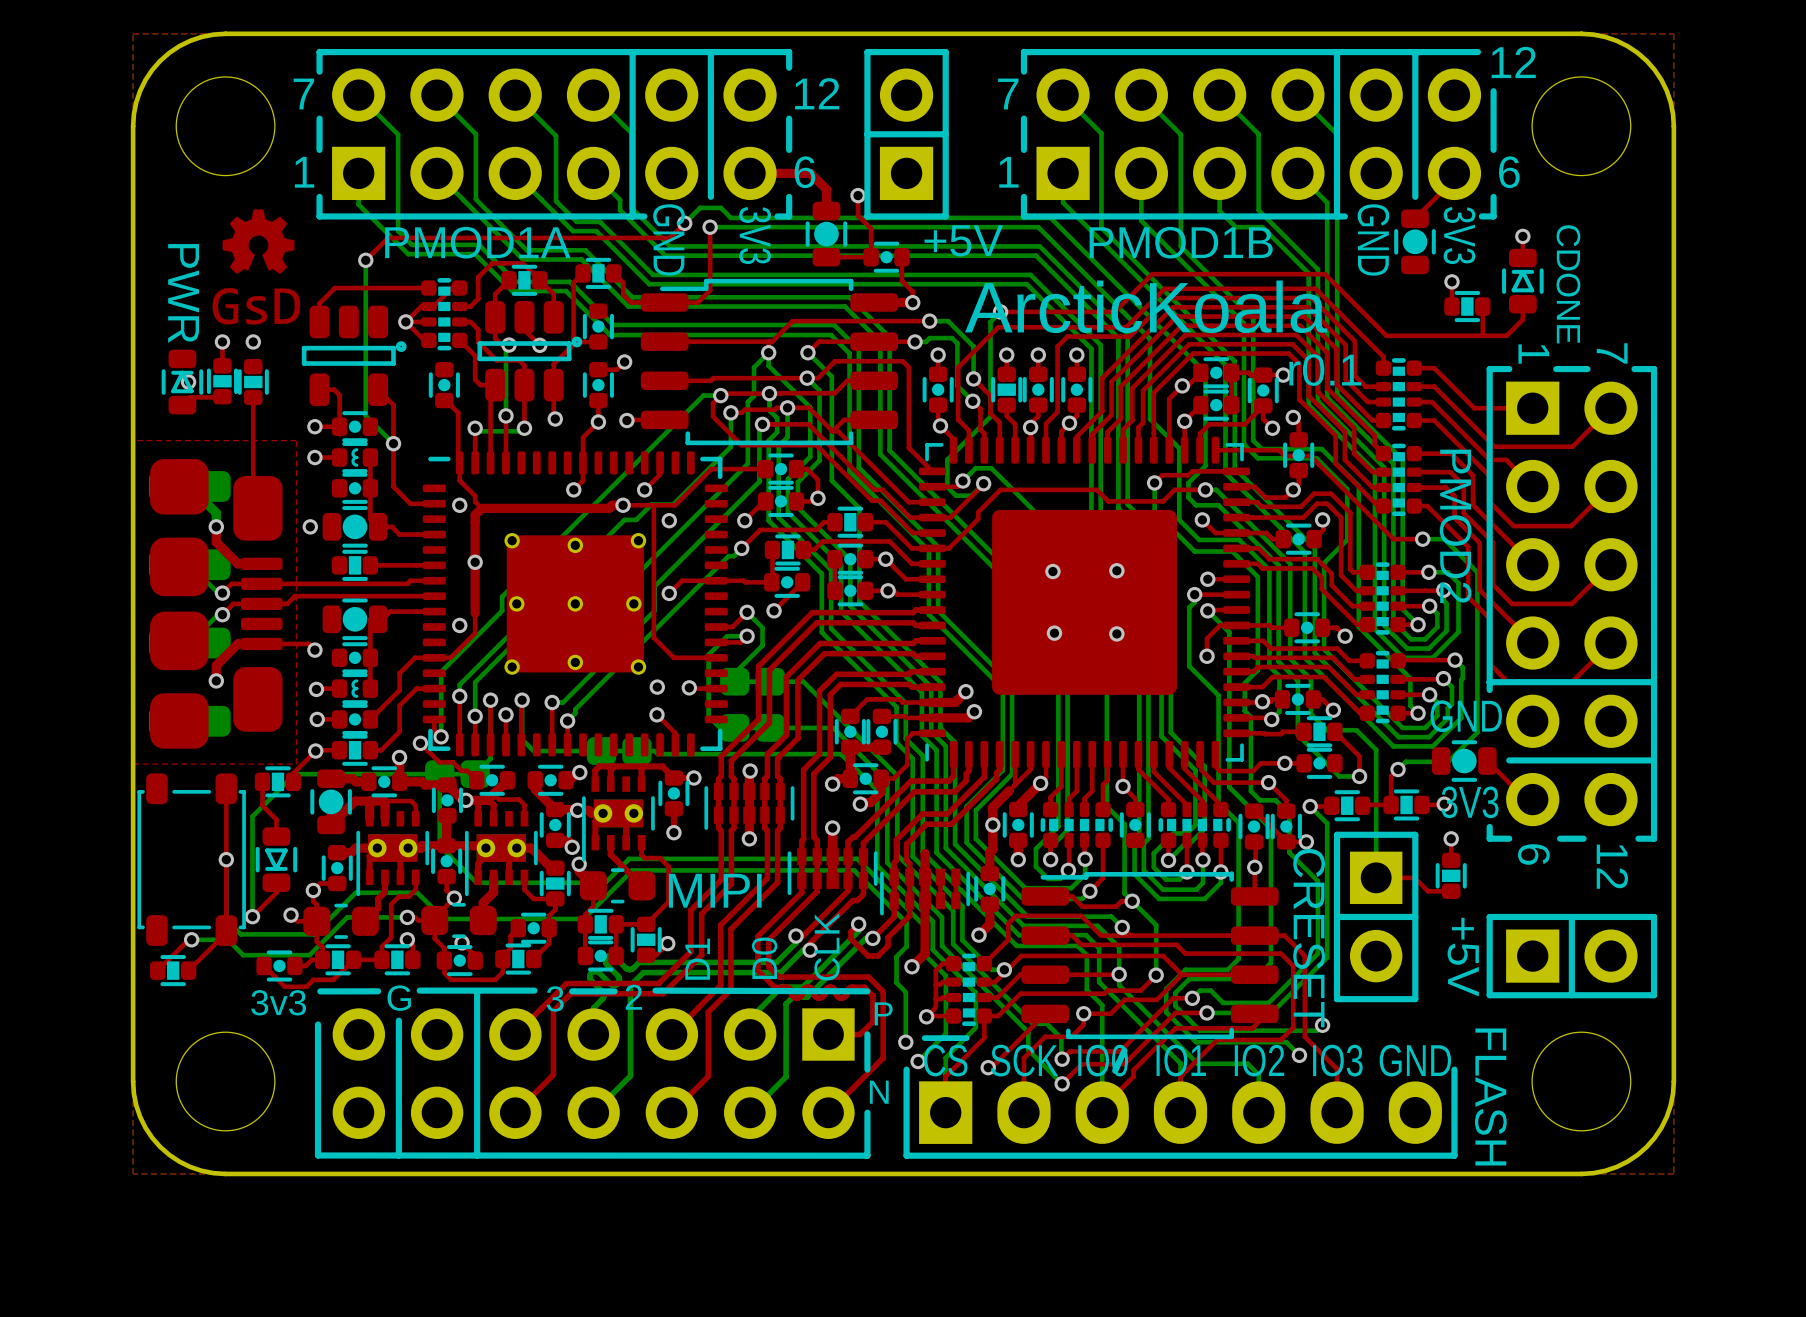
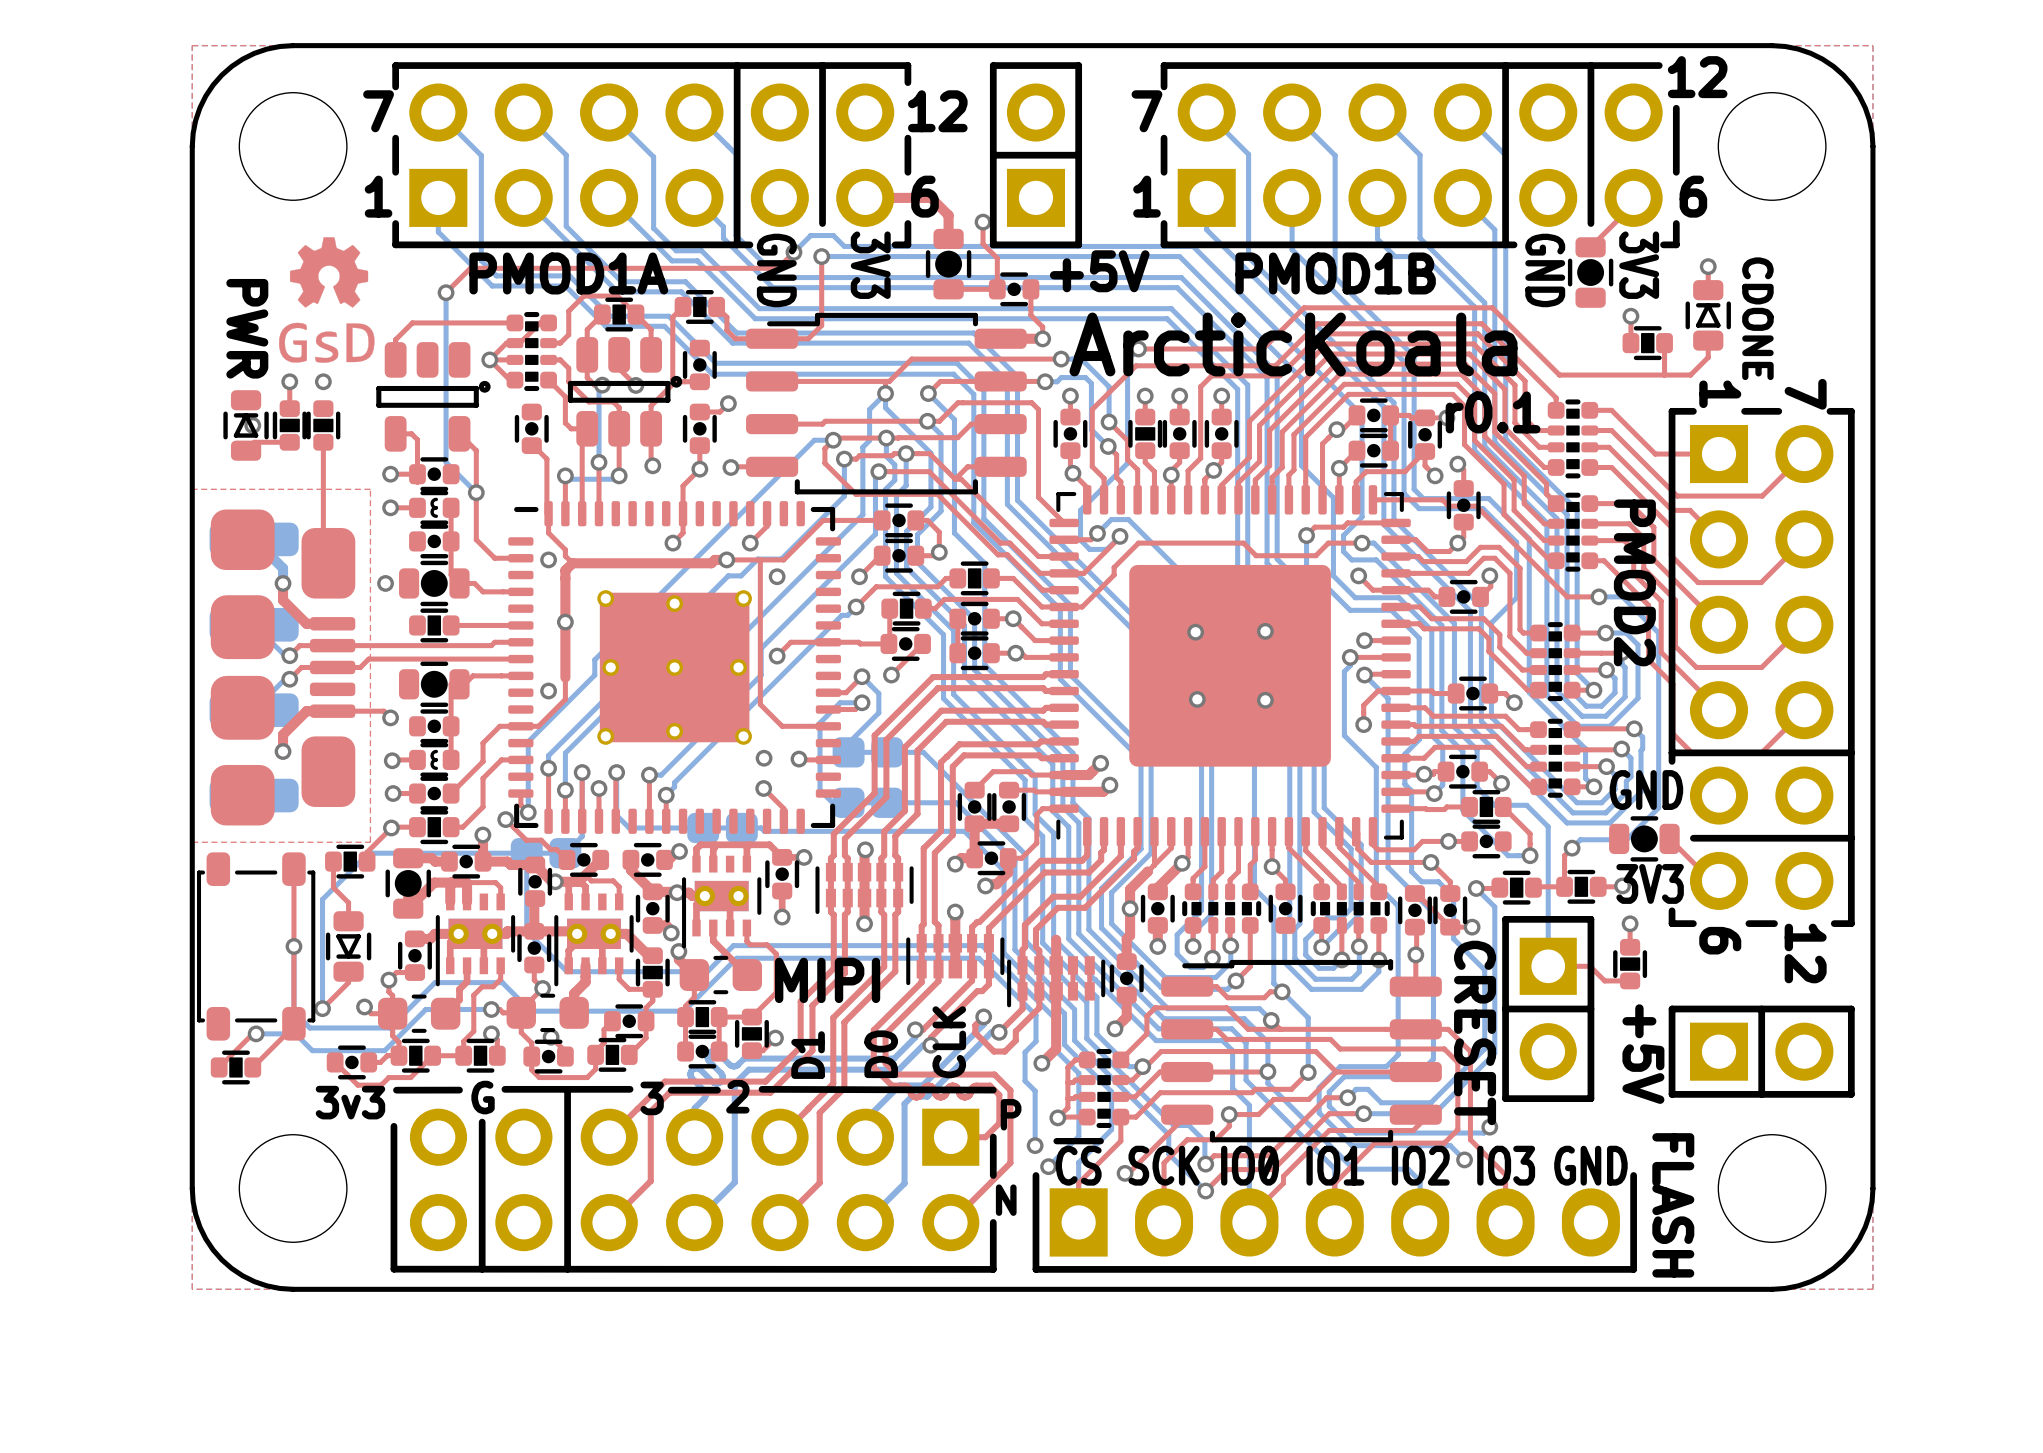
part rotation: 0° (222, 381) -> 180° (289, 425)

